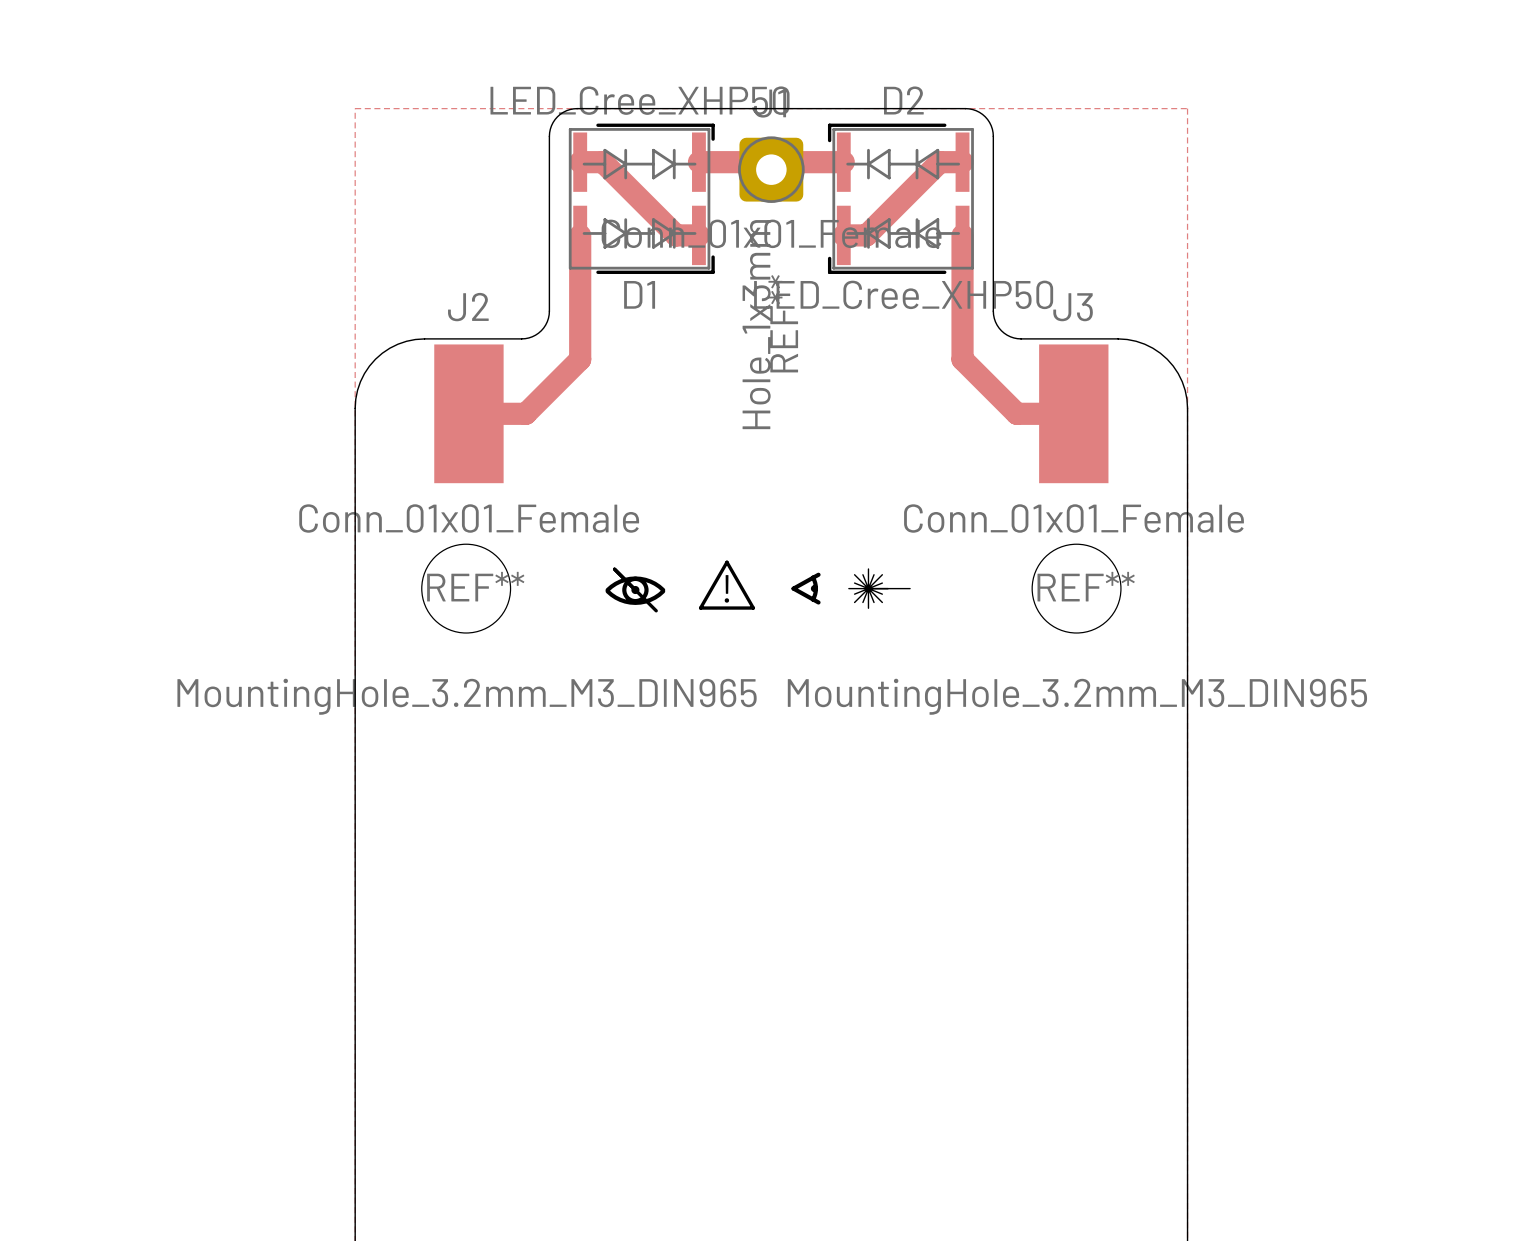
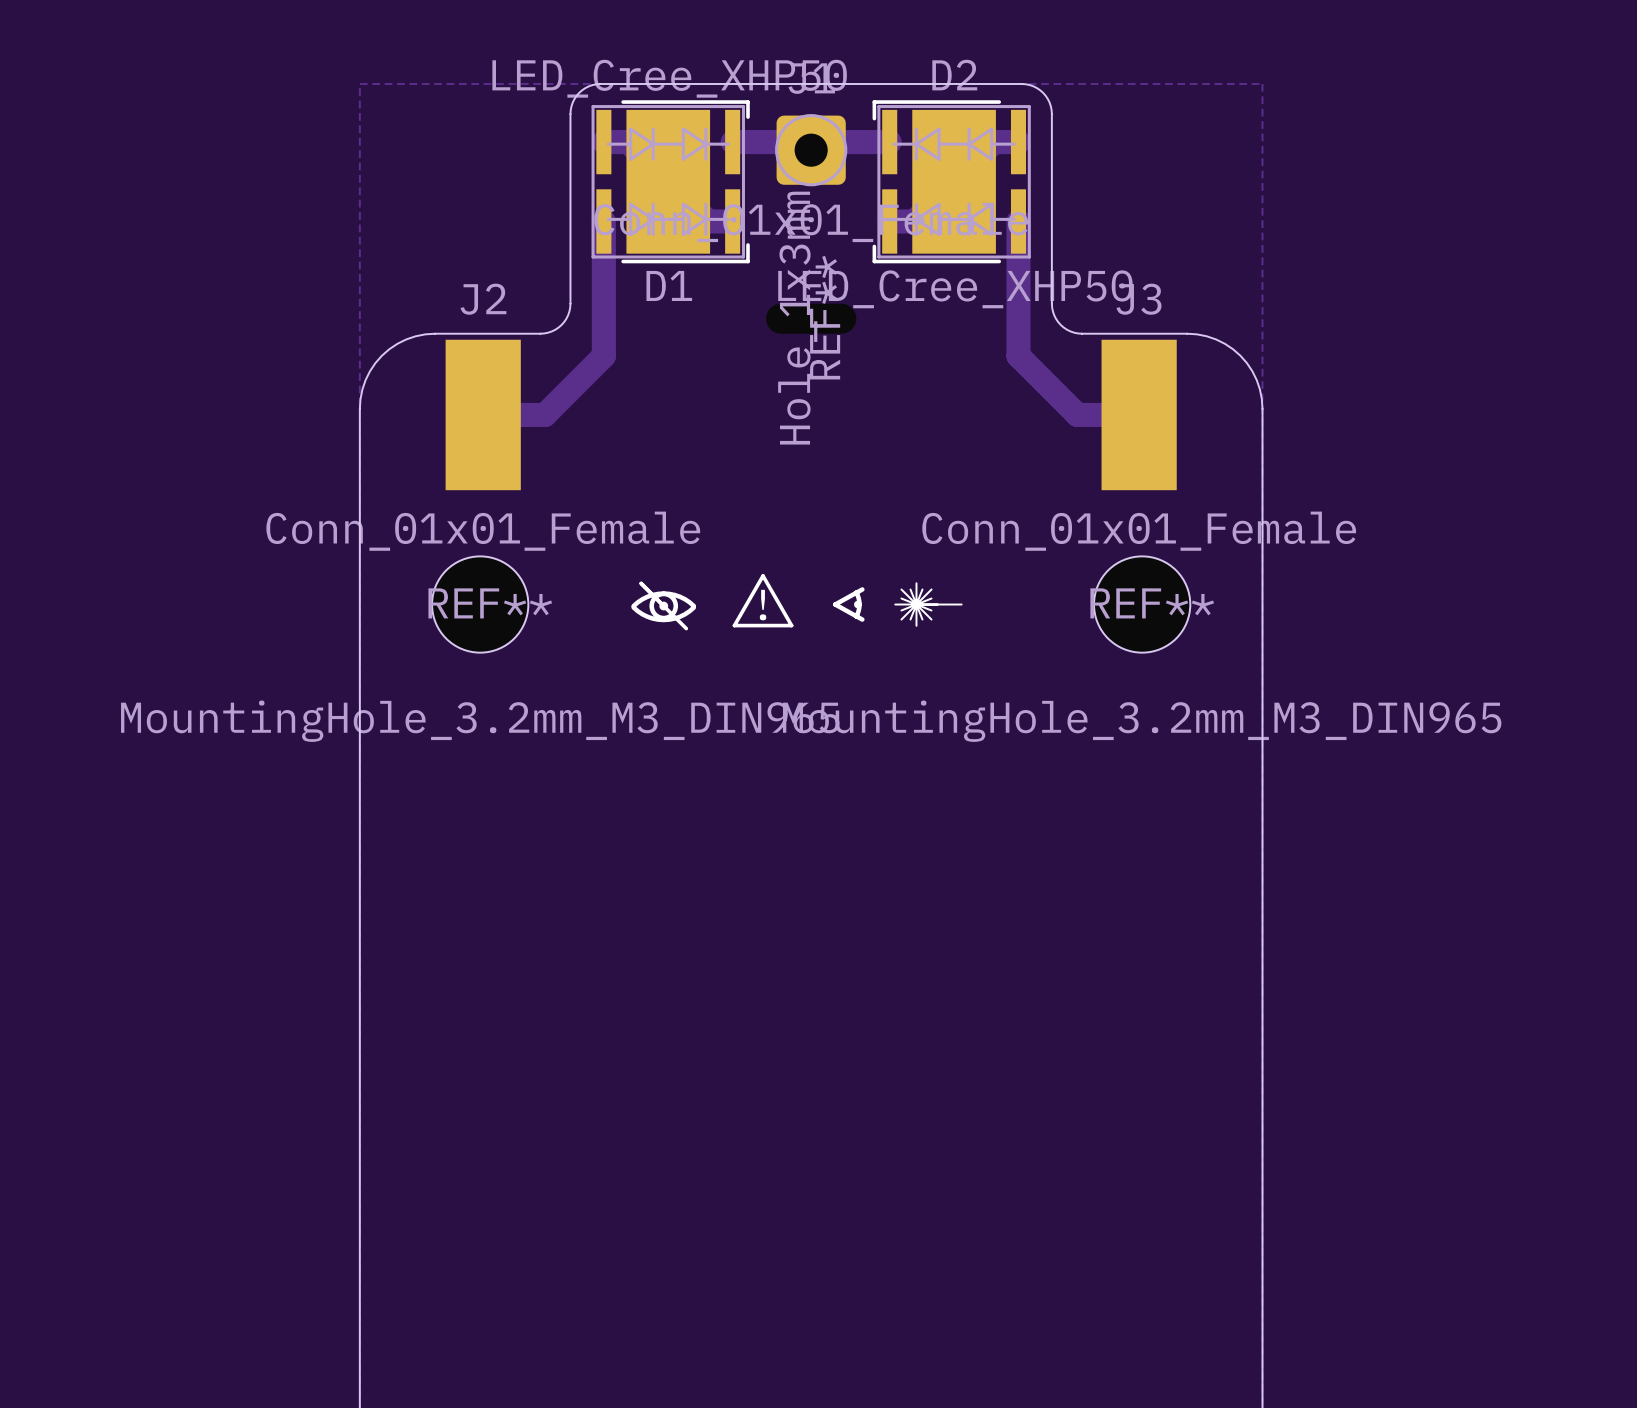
D1 footprint: [568, 123, 715, 274] -> [591, 100, 750, 264]
D2 footprint: [827, 123, 974, 274] -> [872, 100, 1031, 264]

